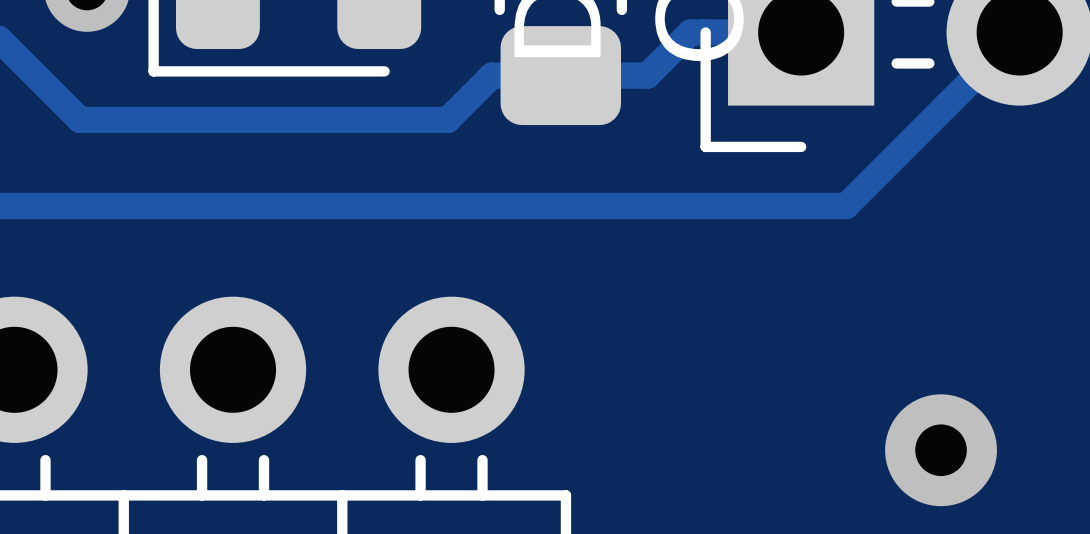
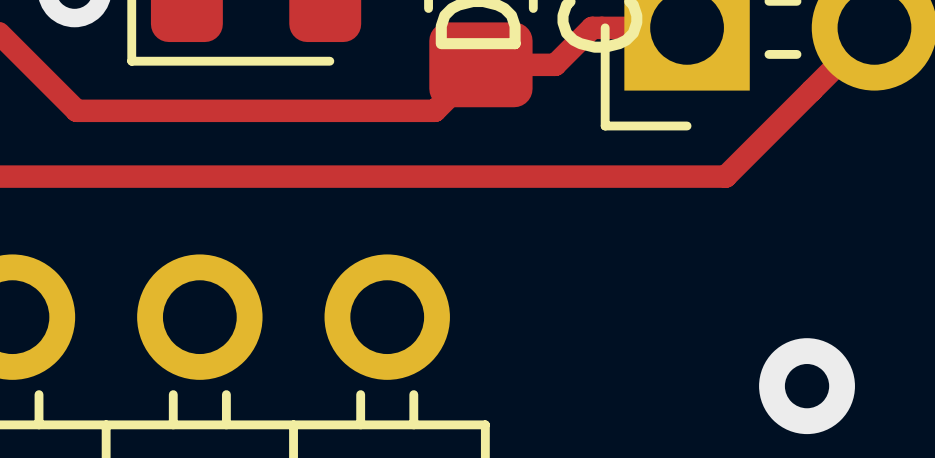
track: (560, 75) (491, 75) (447, 119) (80, 119) -> (480, 64) (434, 110) (76, 110) (68, 102)

